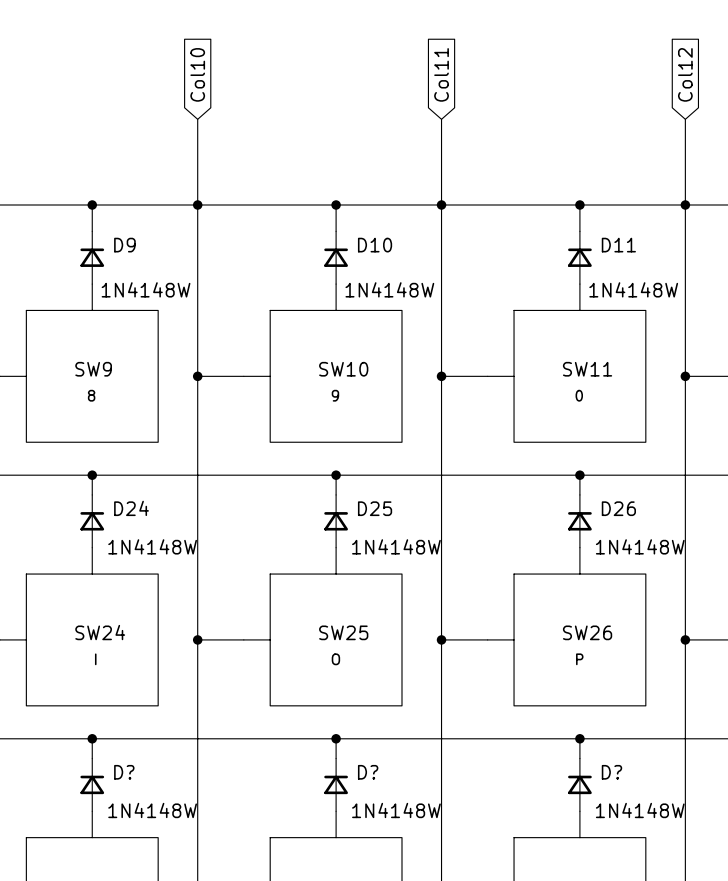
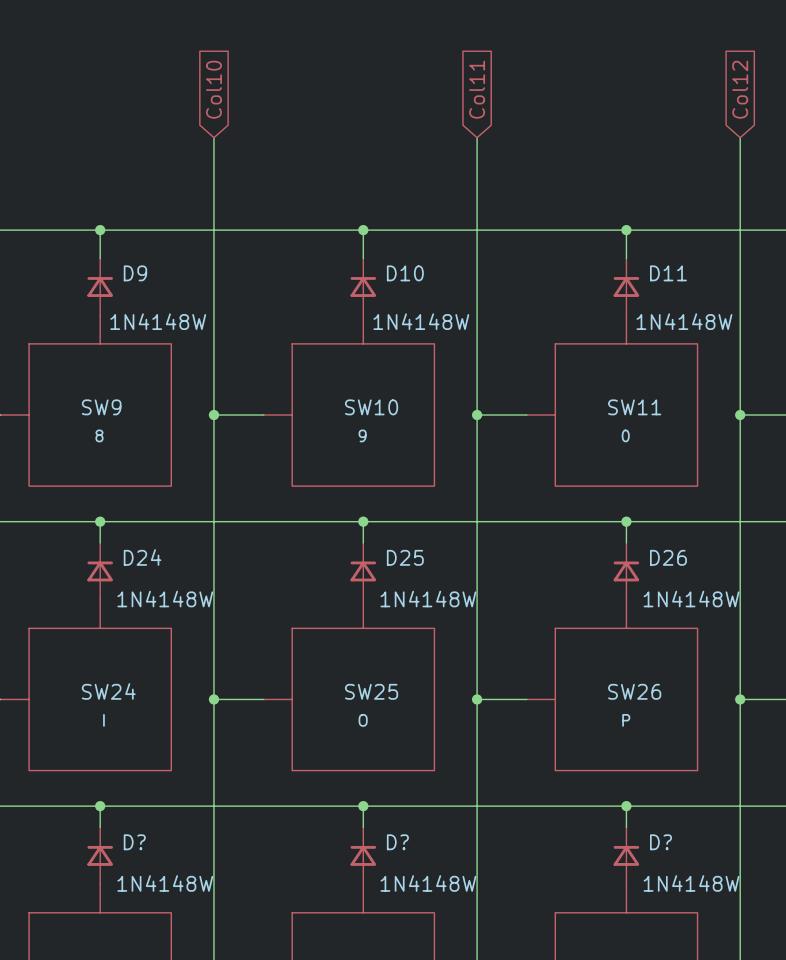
junction: (197, 204) -> none
junction: (441, 204) -> none
junction: (685, 204) -> none

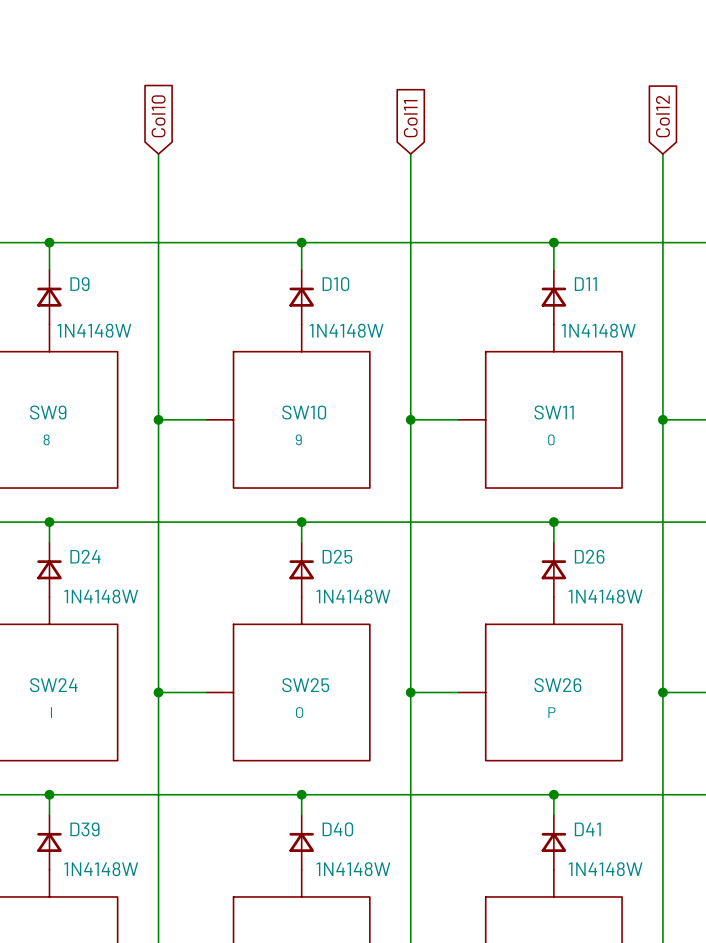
D? name: D? (134, 842) -> D39 (84, 829)
D? name: D? (397, 842) -> D40 (337, 829)
D? name: D? (661, 842) -> D41 (587, 829)

